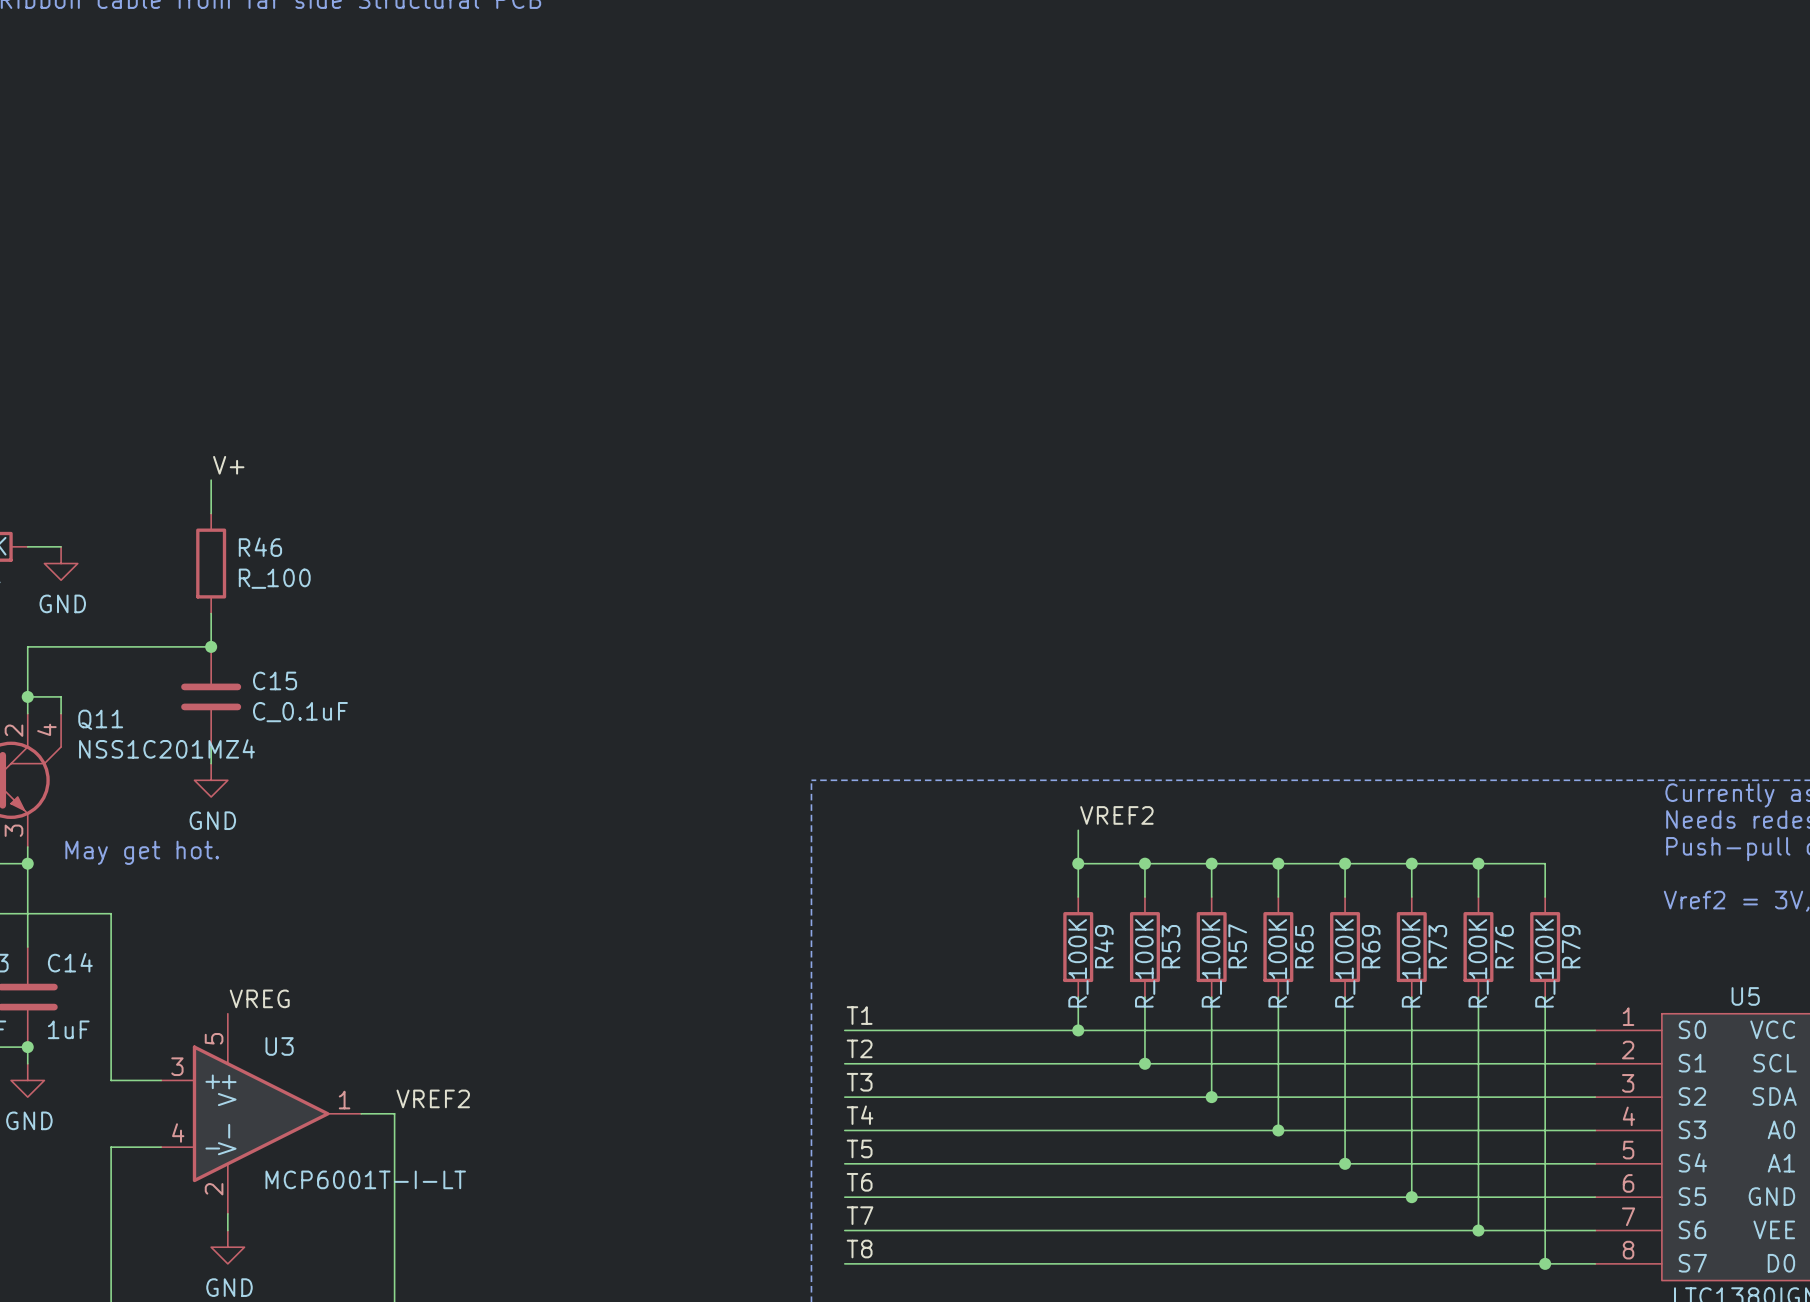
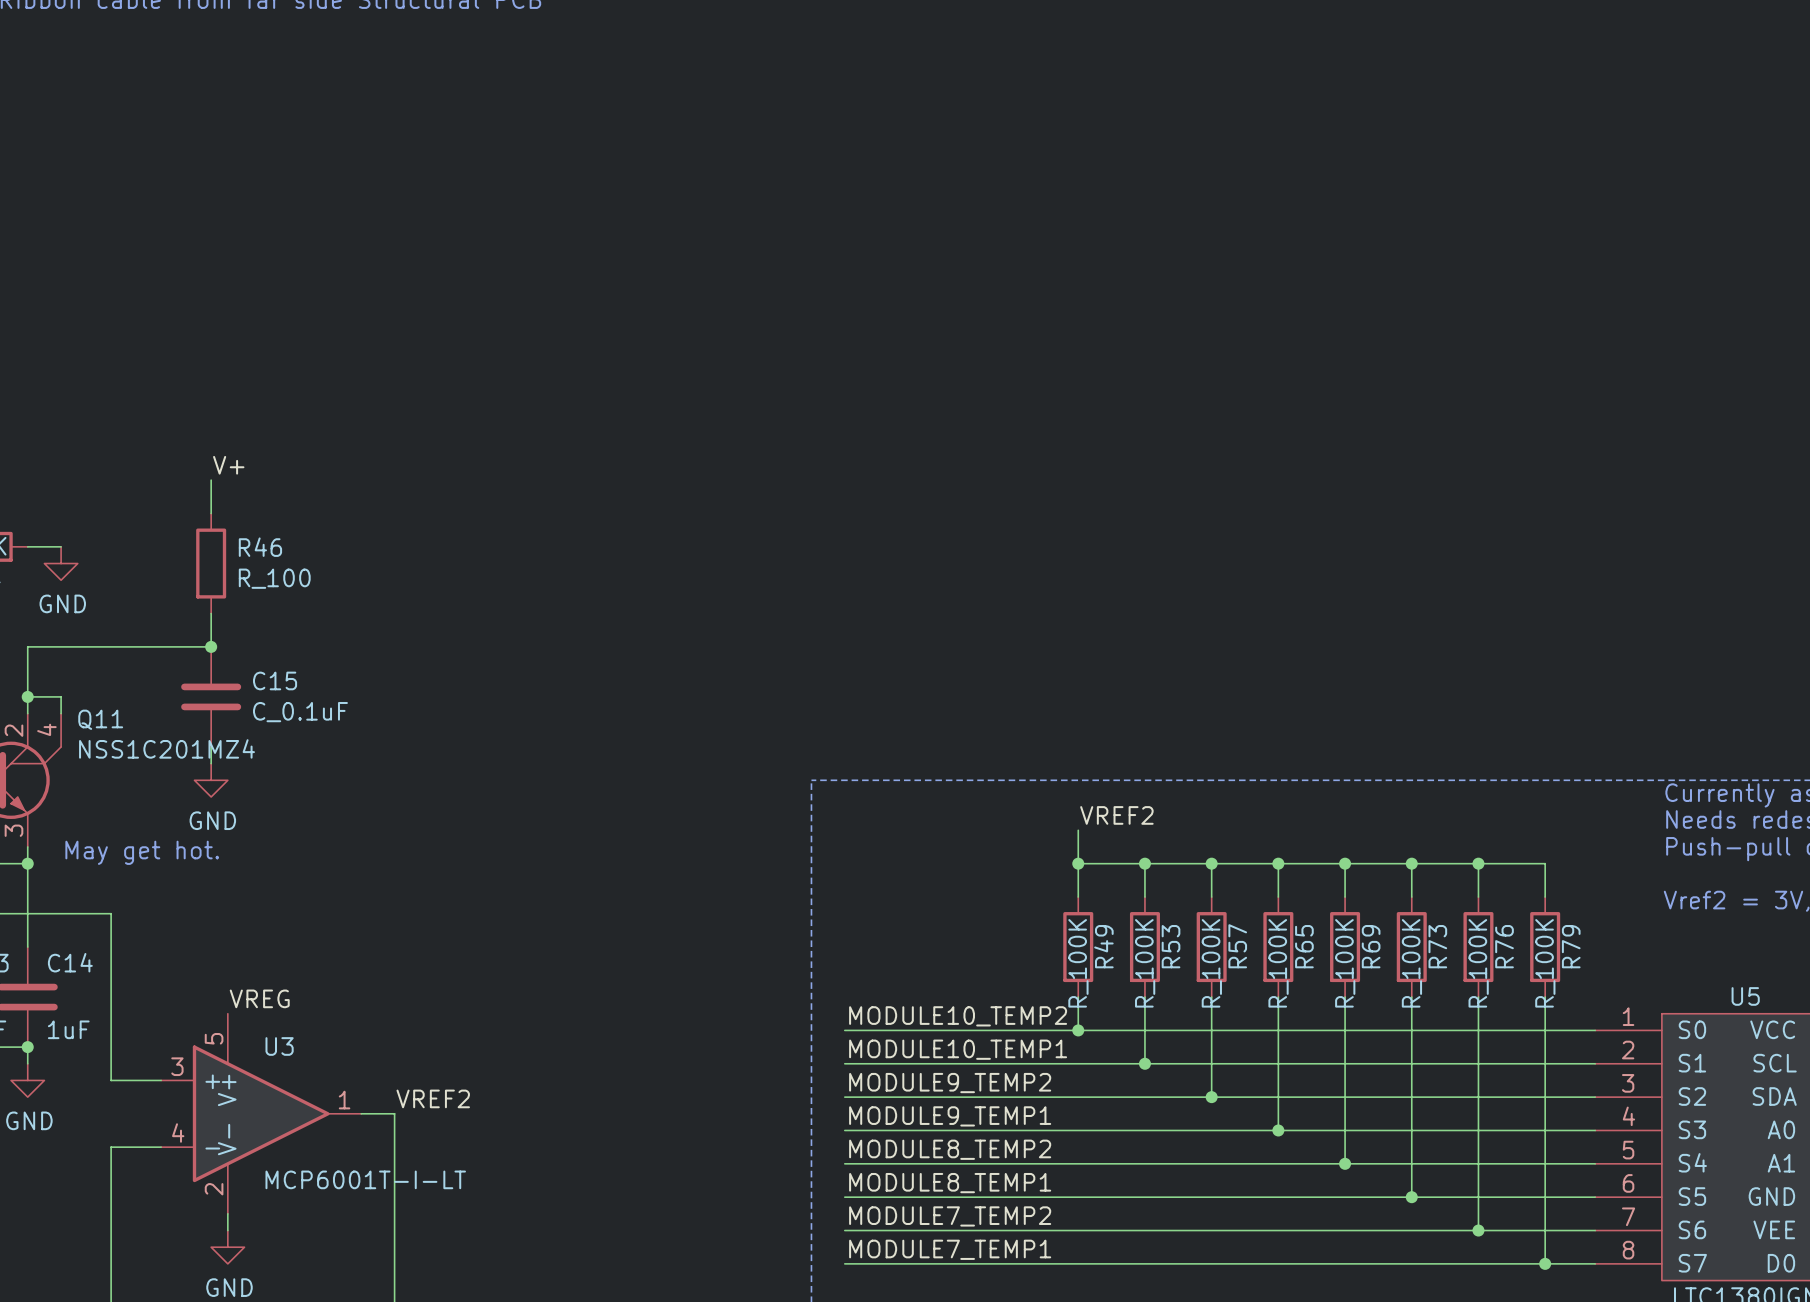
label: T1 (859, 1015) -> MODULE10_TEMP2 (958, 1016)
label: T2 (859, 1048) -> MODULE10_TEMP1 (958, 1049)
label: T3 (859, 1082) -> MODULE9_TEMP2 (950, 1083)
label: T4 (860, 1115) -> MODULE9_TEMP1 (950, 1116)
label: T5 (859, 1148) -> MODULE8_TEMP2 (950, 1149)
label: T6 (859, 1182) -> MODULE8_TEMP1 (950, 1183)
label: T7 (860, 1215) -> MODULE7_TEMP2 (950, 1216)
label: T8 (859, 1249) -> MODULE7_TEMP1 (950, 1249)

